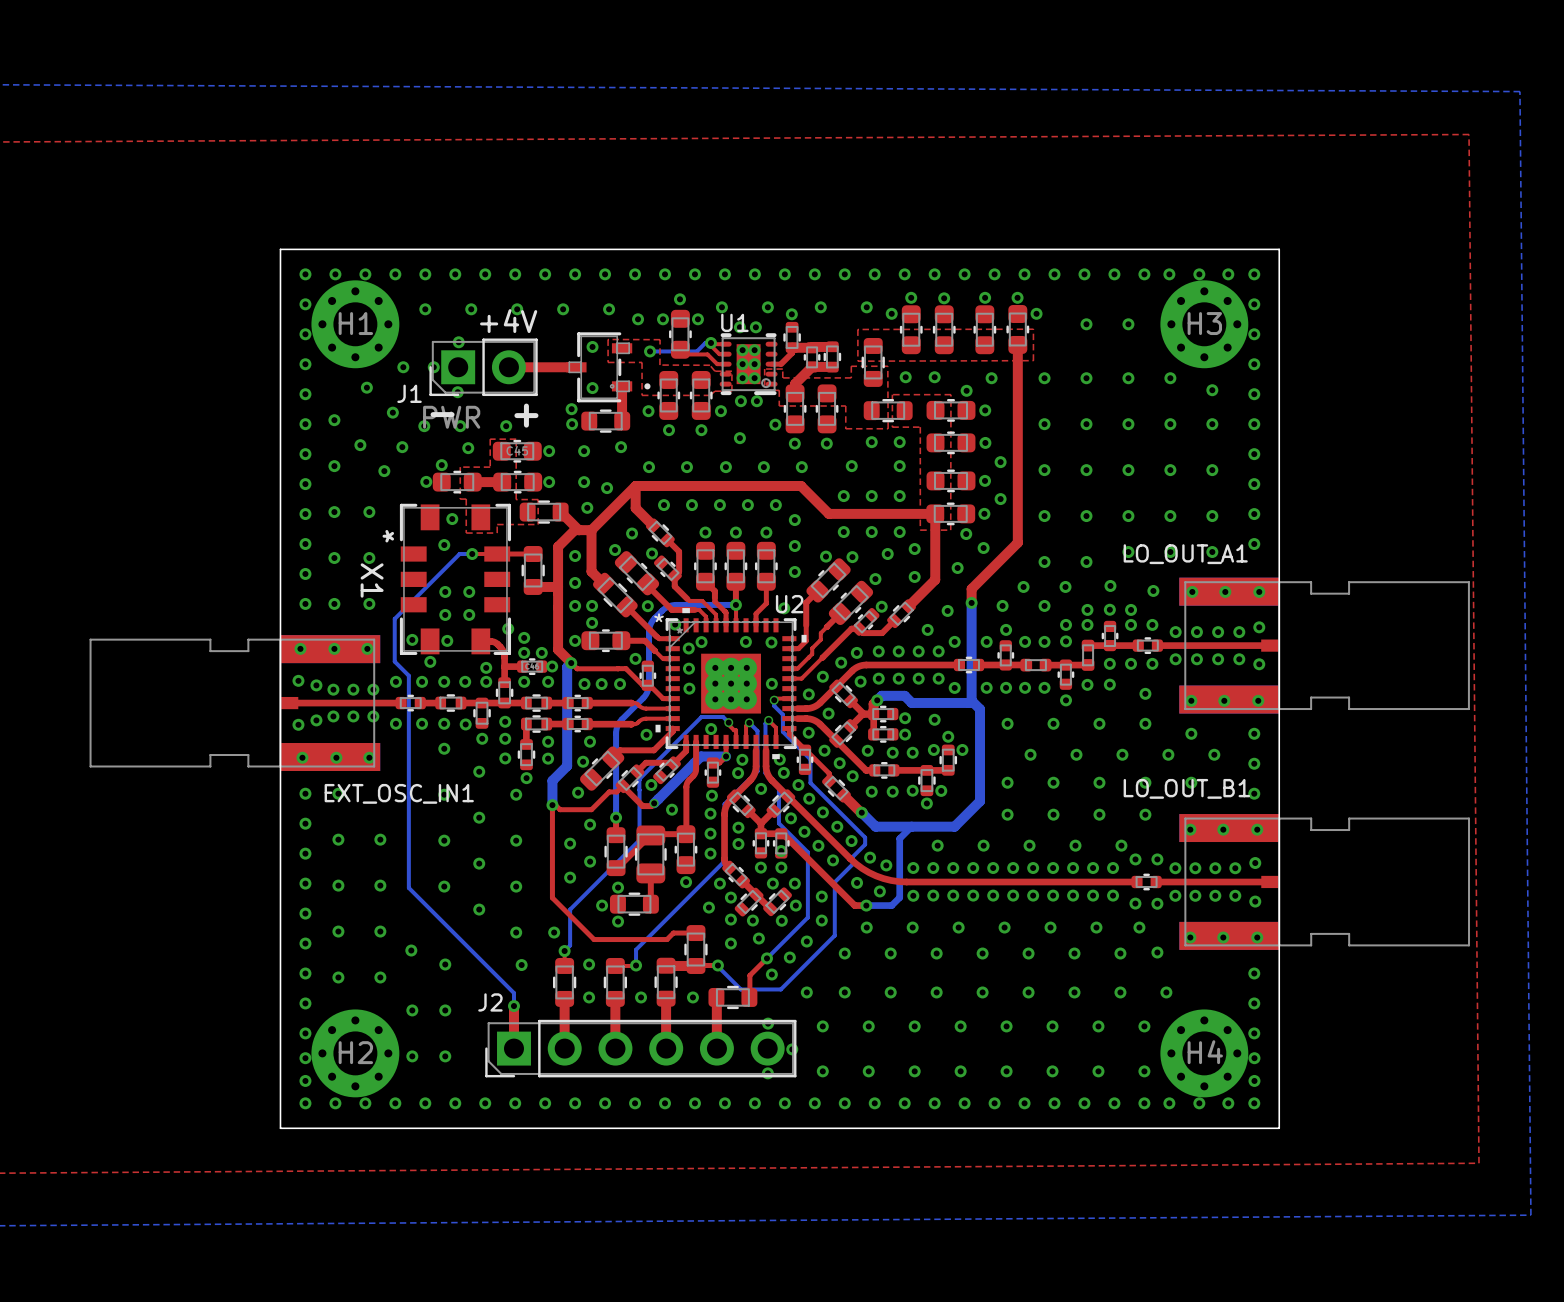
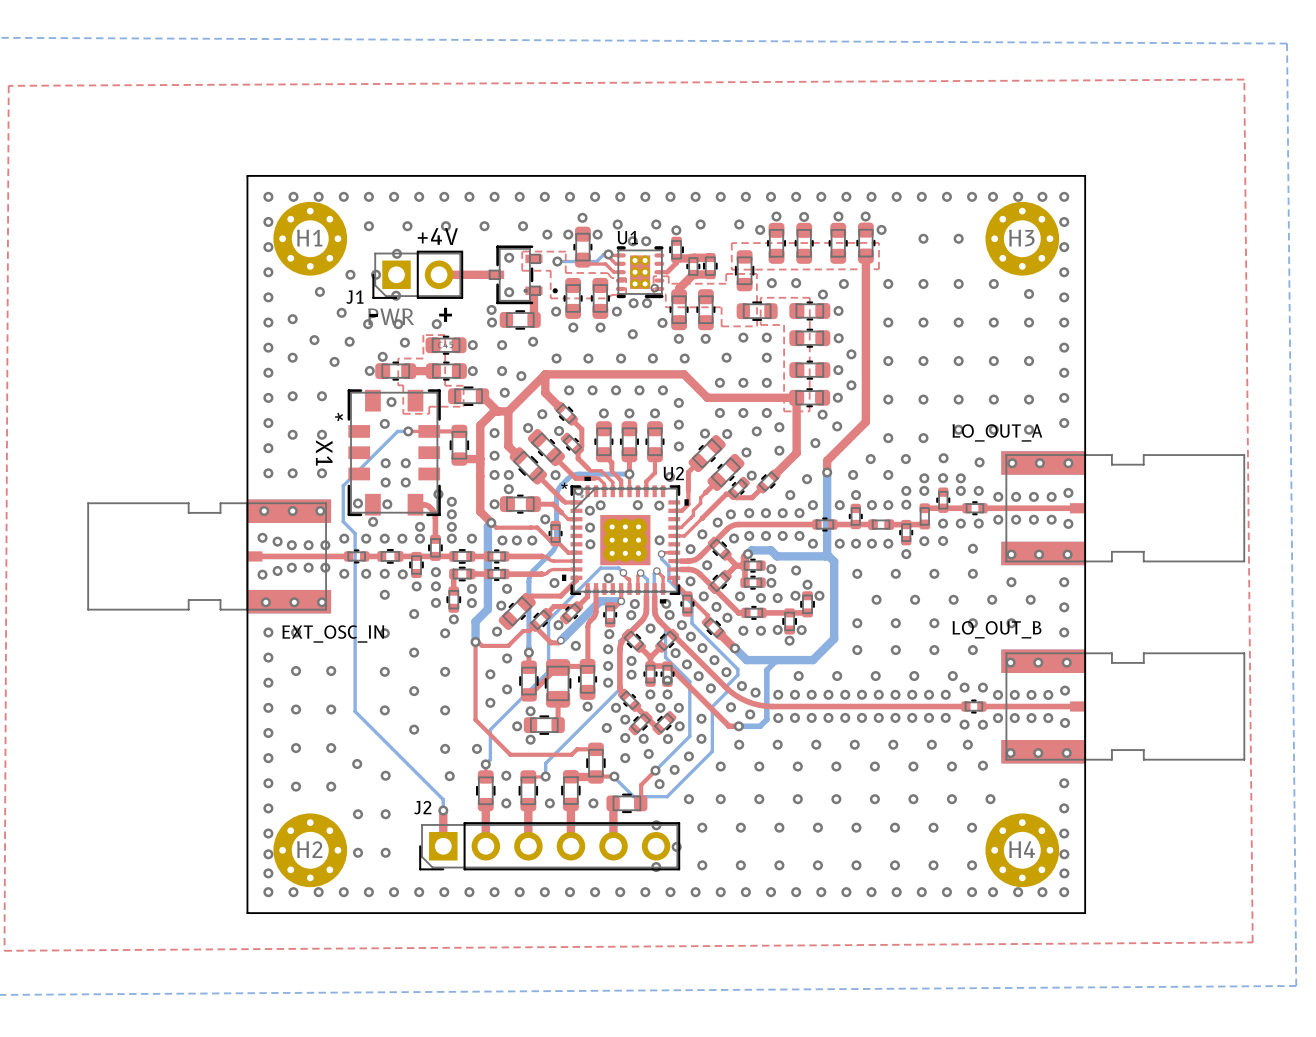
LO_OUT_A1 name: LO_OUT_A1 (1185, 554) -> LO_OUT_A (997, 432)
via: (541, 652) -> none
top track: (504, 666) (522, 666) -> none
part: (532, 666) -> none
via: (552, 666) -> none
via: none -> (451, 526)
LO_OUT_B1 name: LO_OUT_B1 (1186, 788) -> LO_OUT_B (996, 629)
EXT_OSC_IN1 name: EXT_OSC_IN1 (399, 793) -> EXT_OSC_IN (333, 633)

